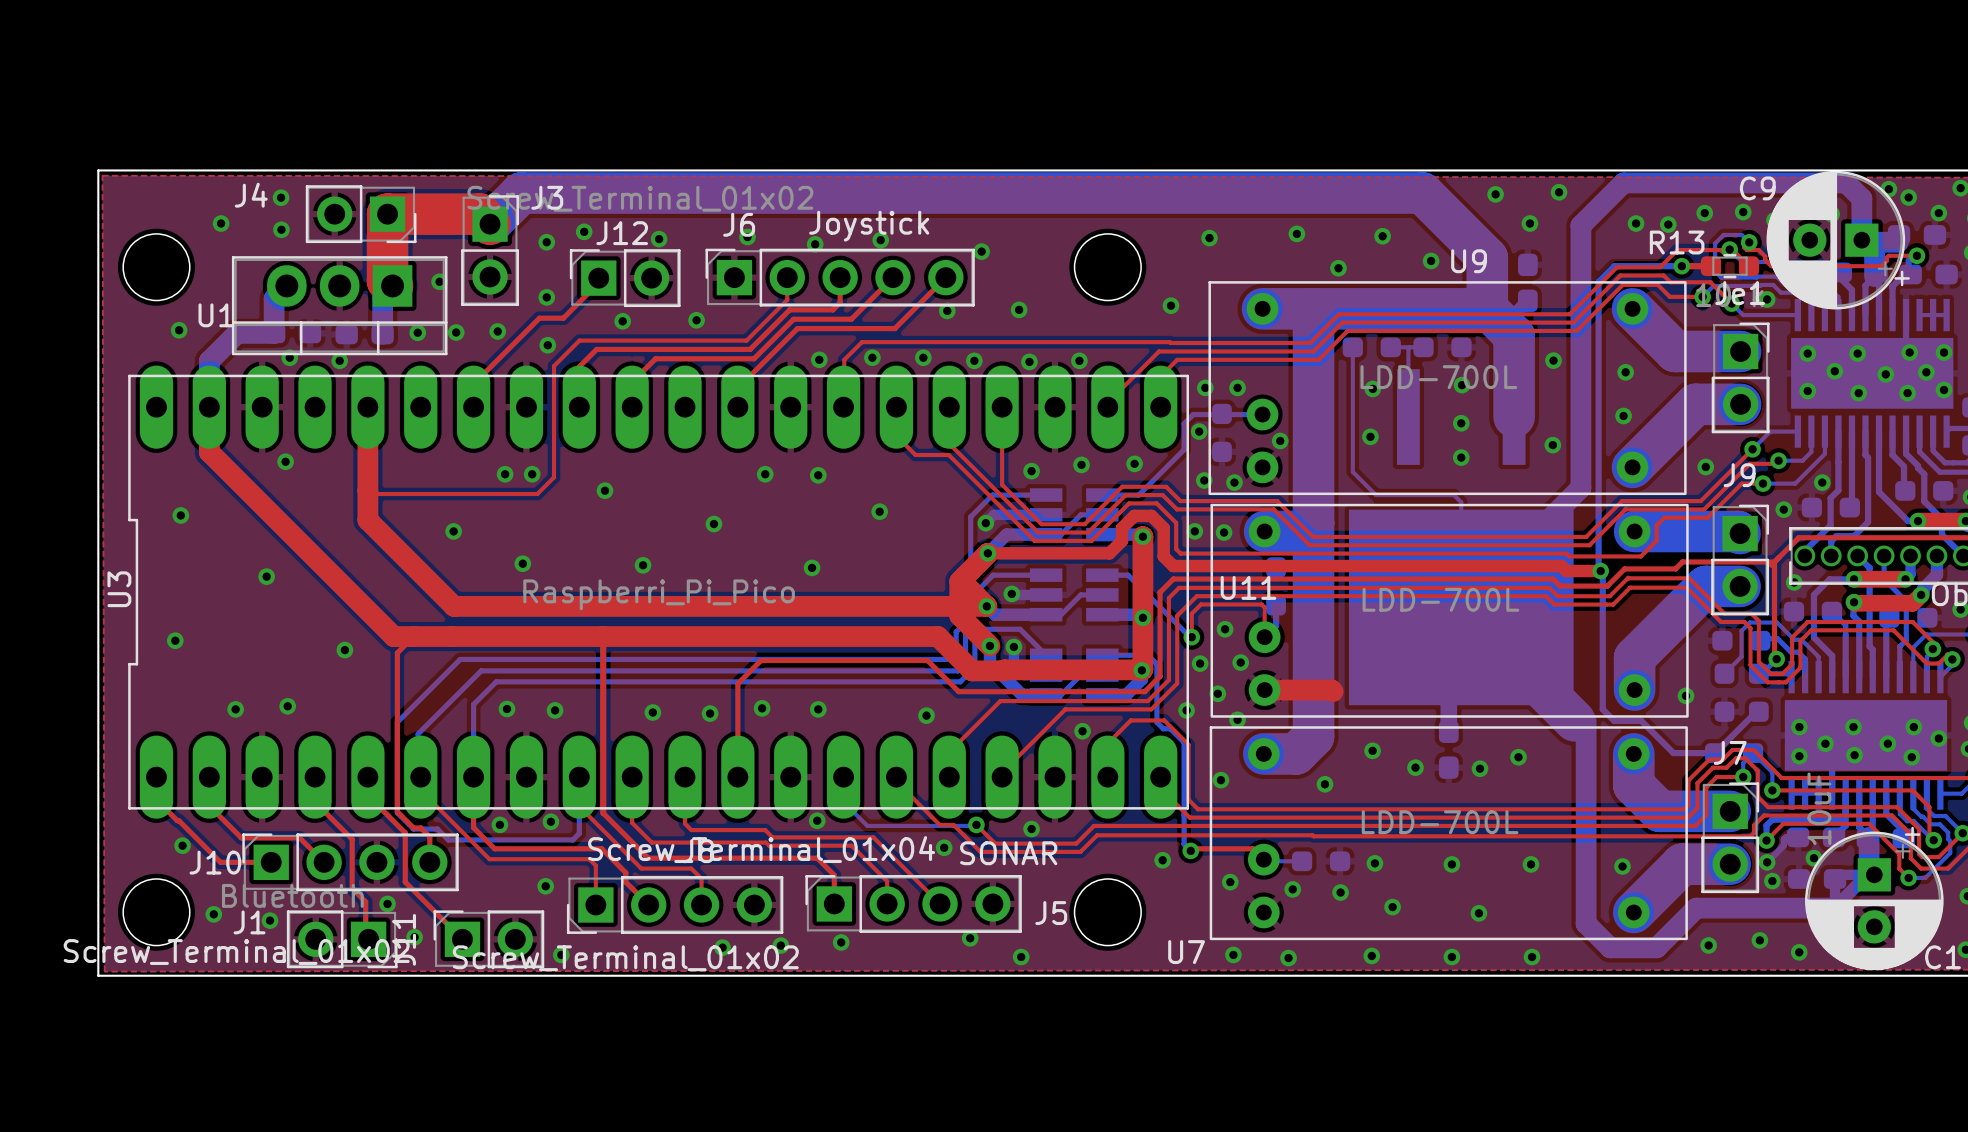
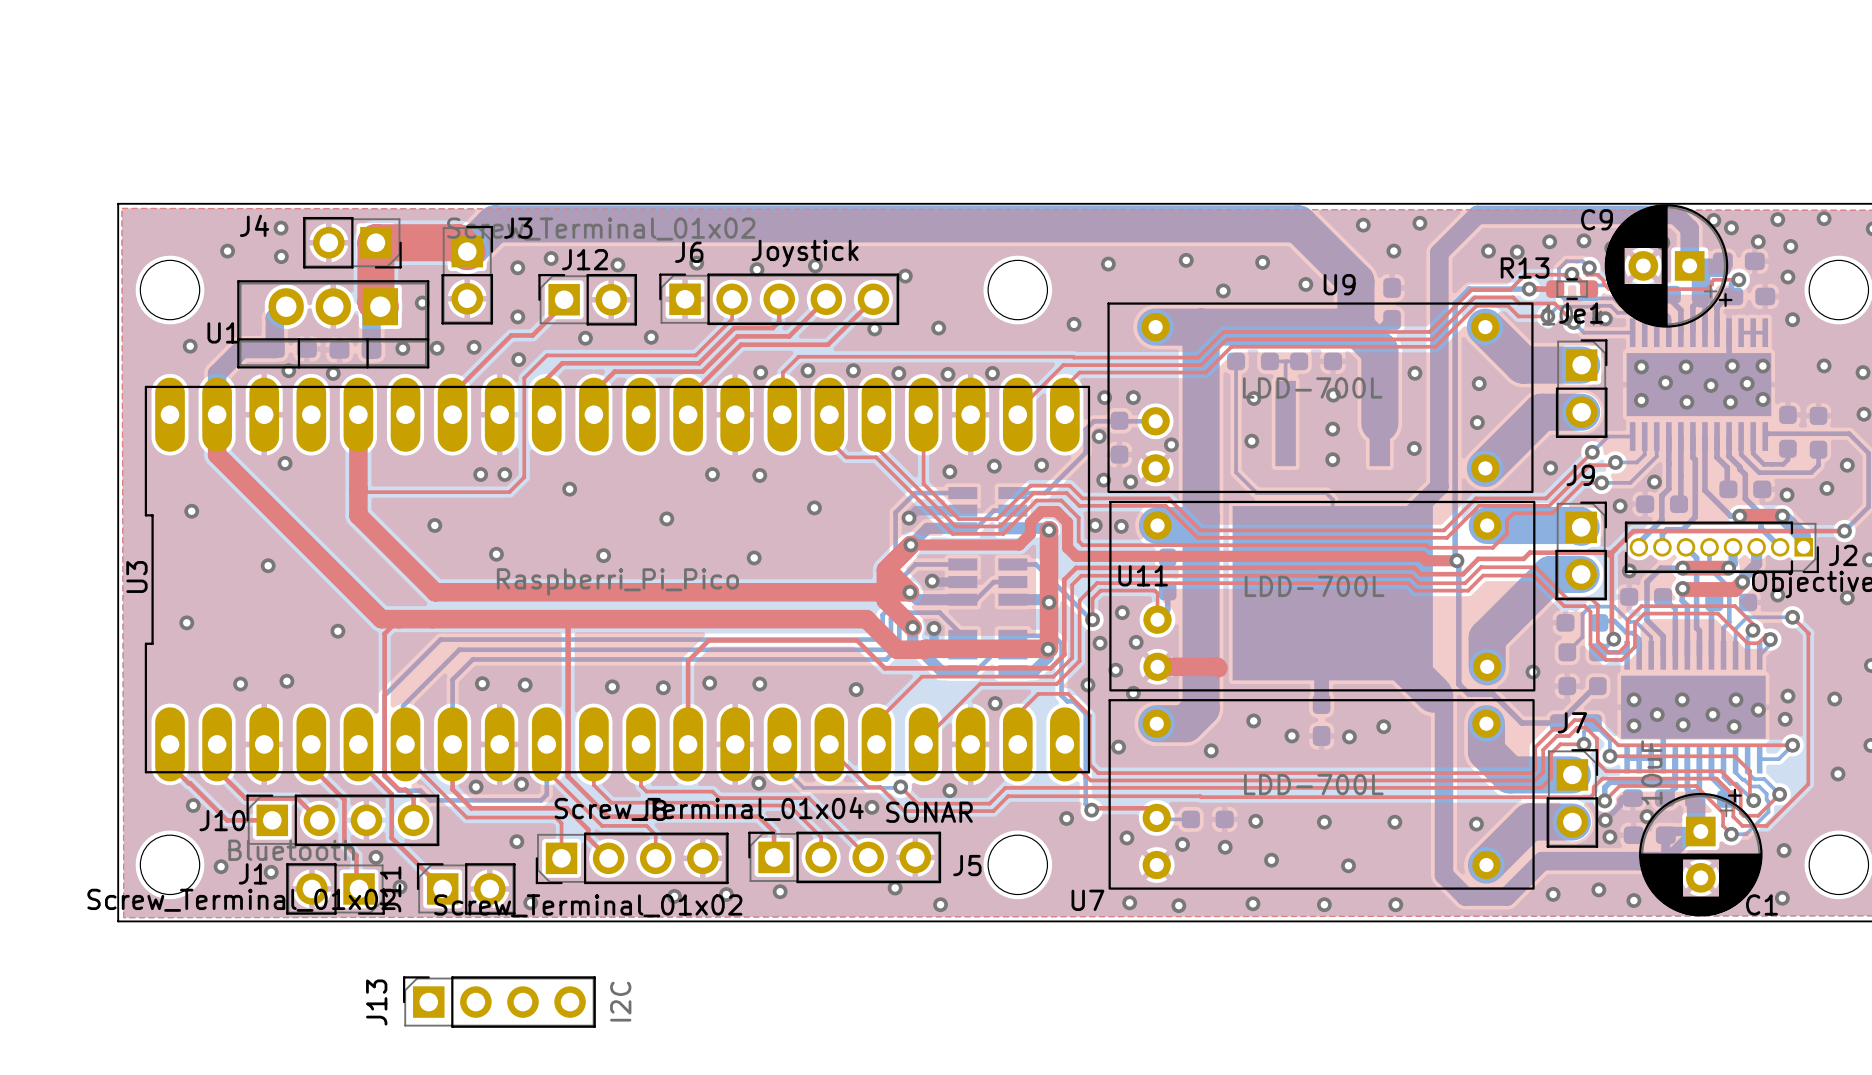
J13: none -> I2C (499, 1002)

